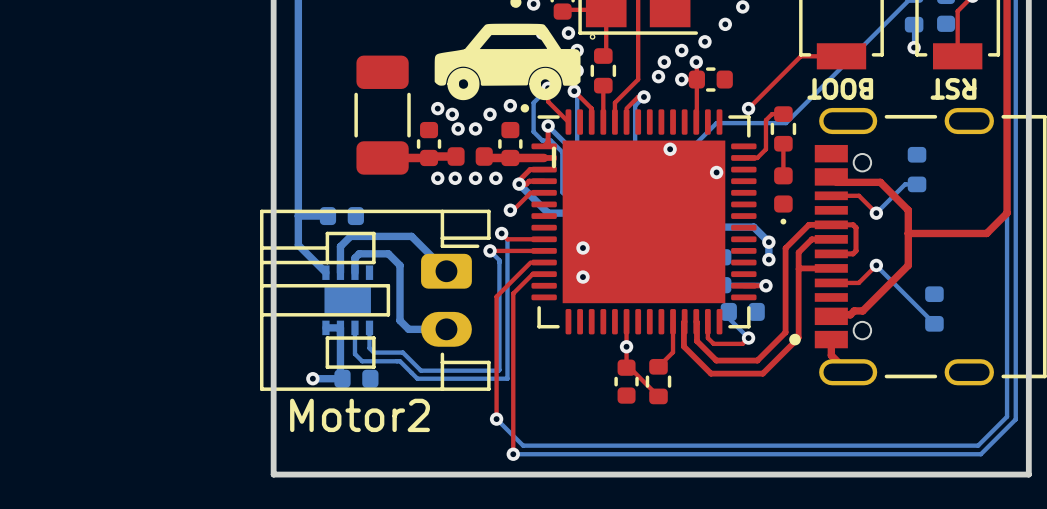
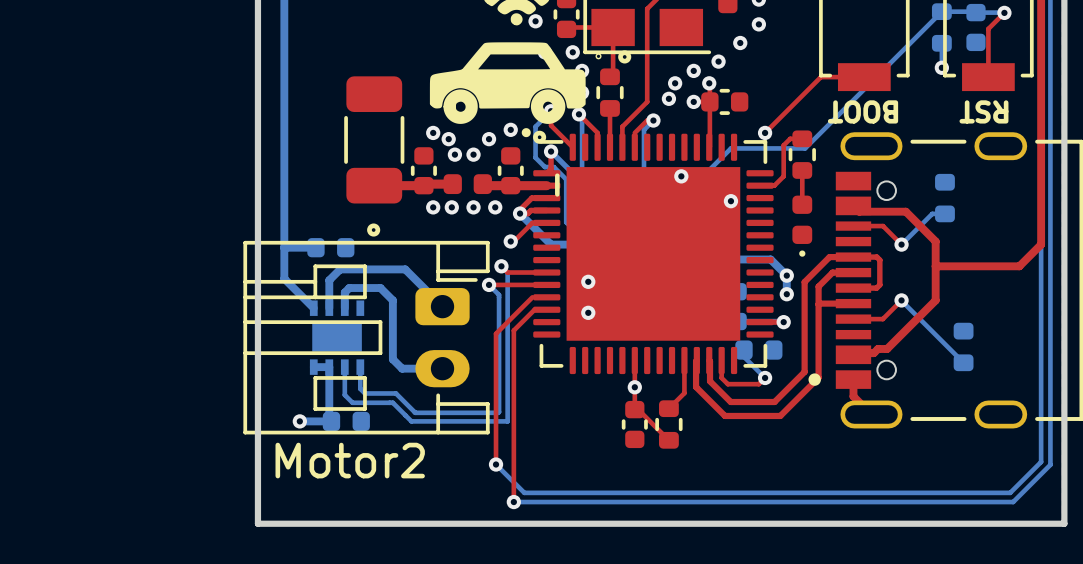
drawing: none -> [618, 50, 632, 64]
drawing: none -> [533, 130, 547, 144]
drawing: none -> [367, 223, 381, 237]

